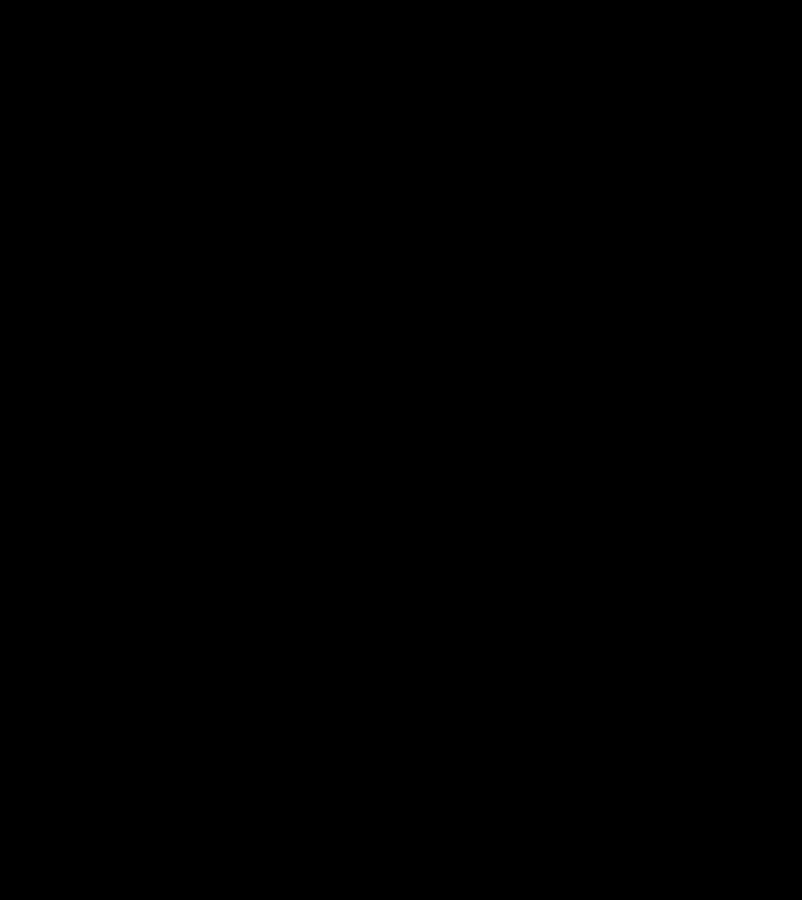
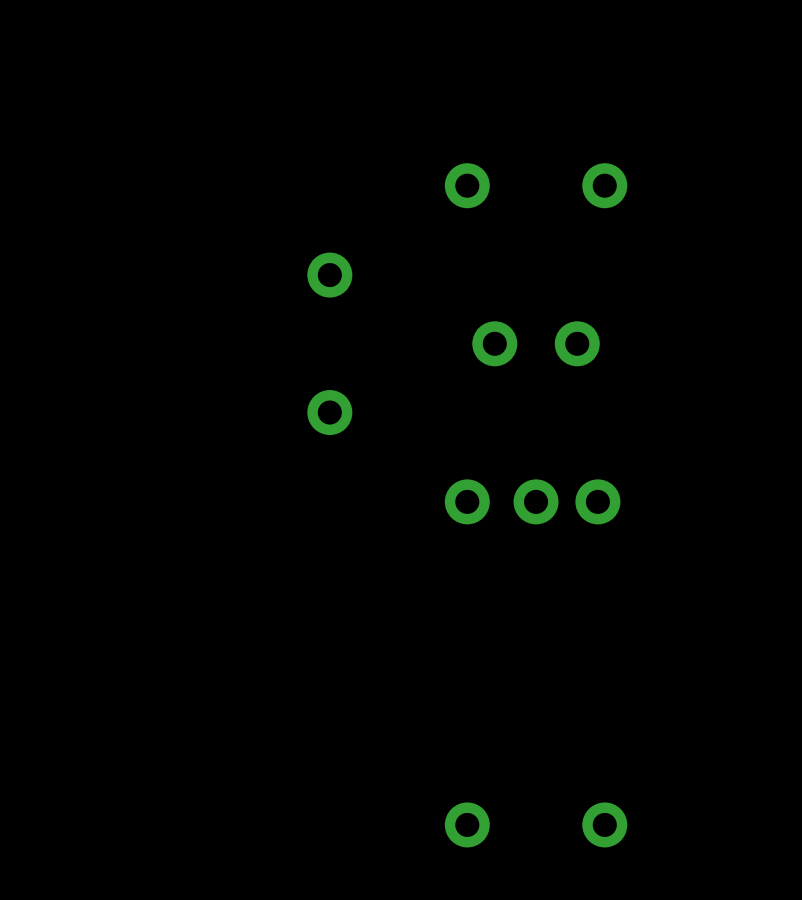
via: none -> (467, 185)
via: none -> (604, 185)
via: none -> (329, 275)
via: none -> (494, 343)
via: none -> (577, 343)
via: none -> (329, 412)
via: none -> (467, 501)
via: none -> (536, 501)
via: none -> (597, 501)
via: none -> (467, 824)
via: none -> (604, 824)

